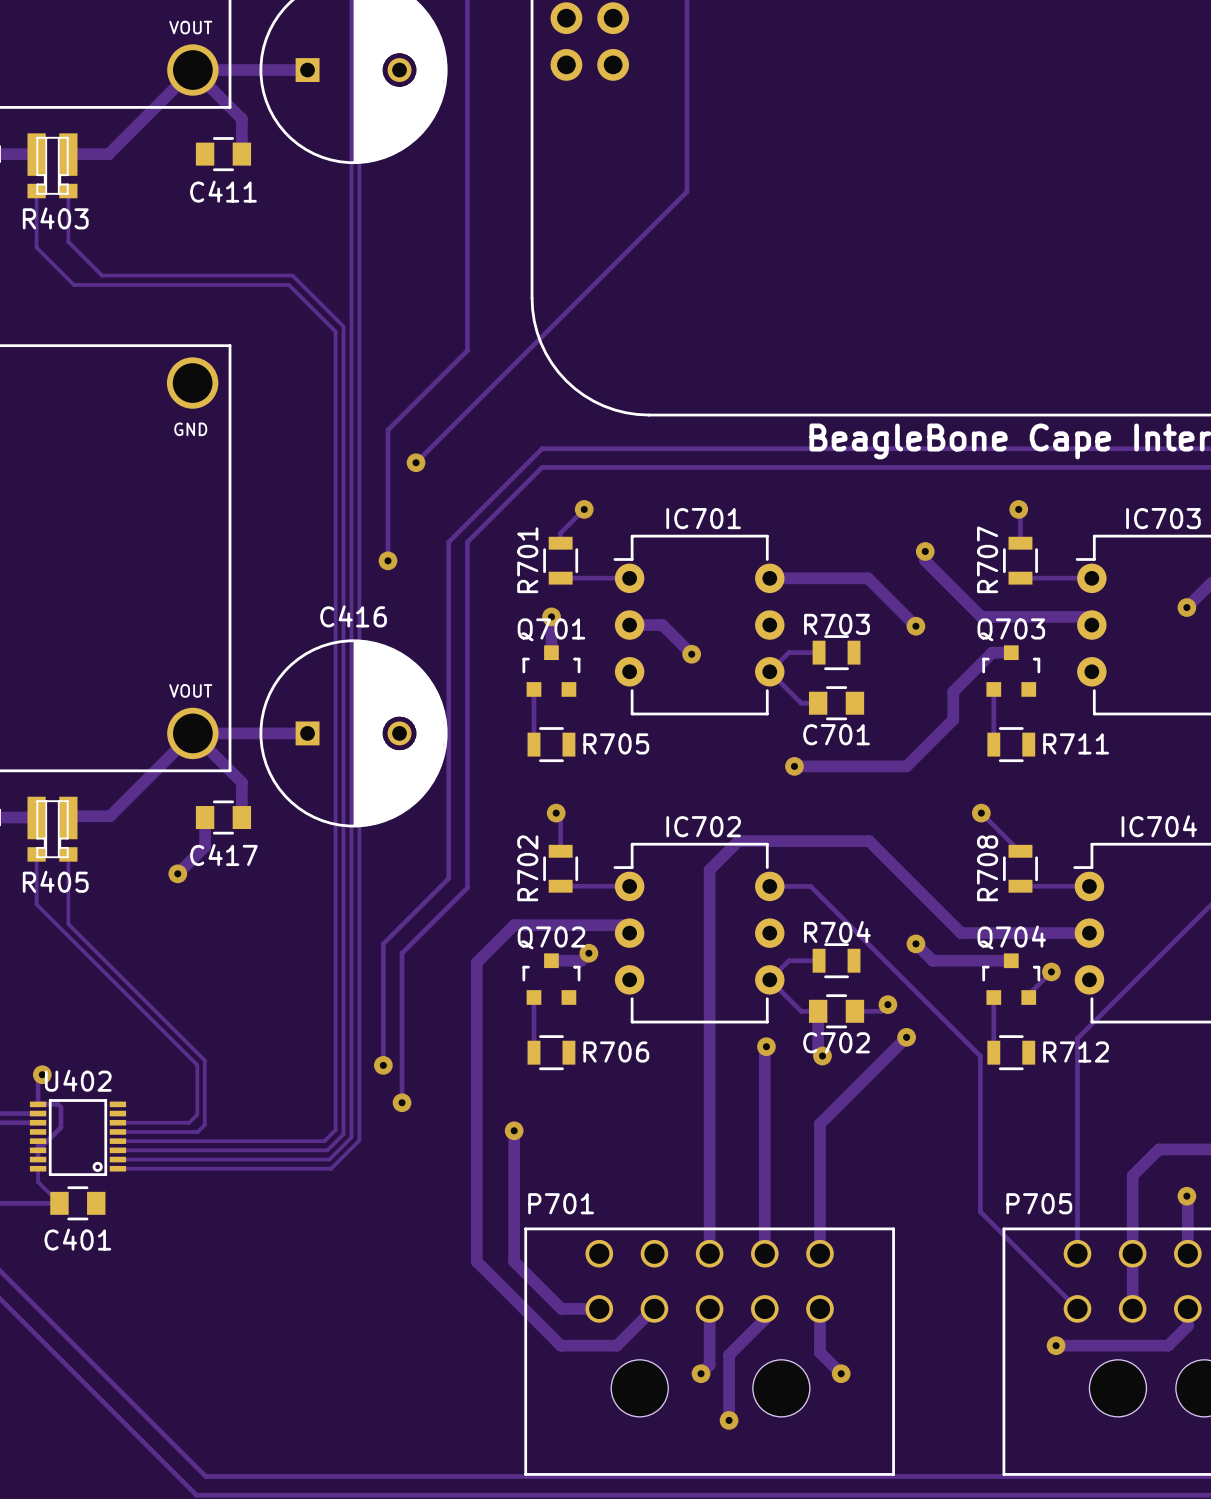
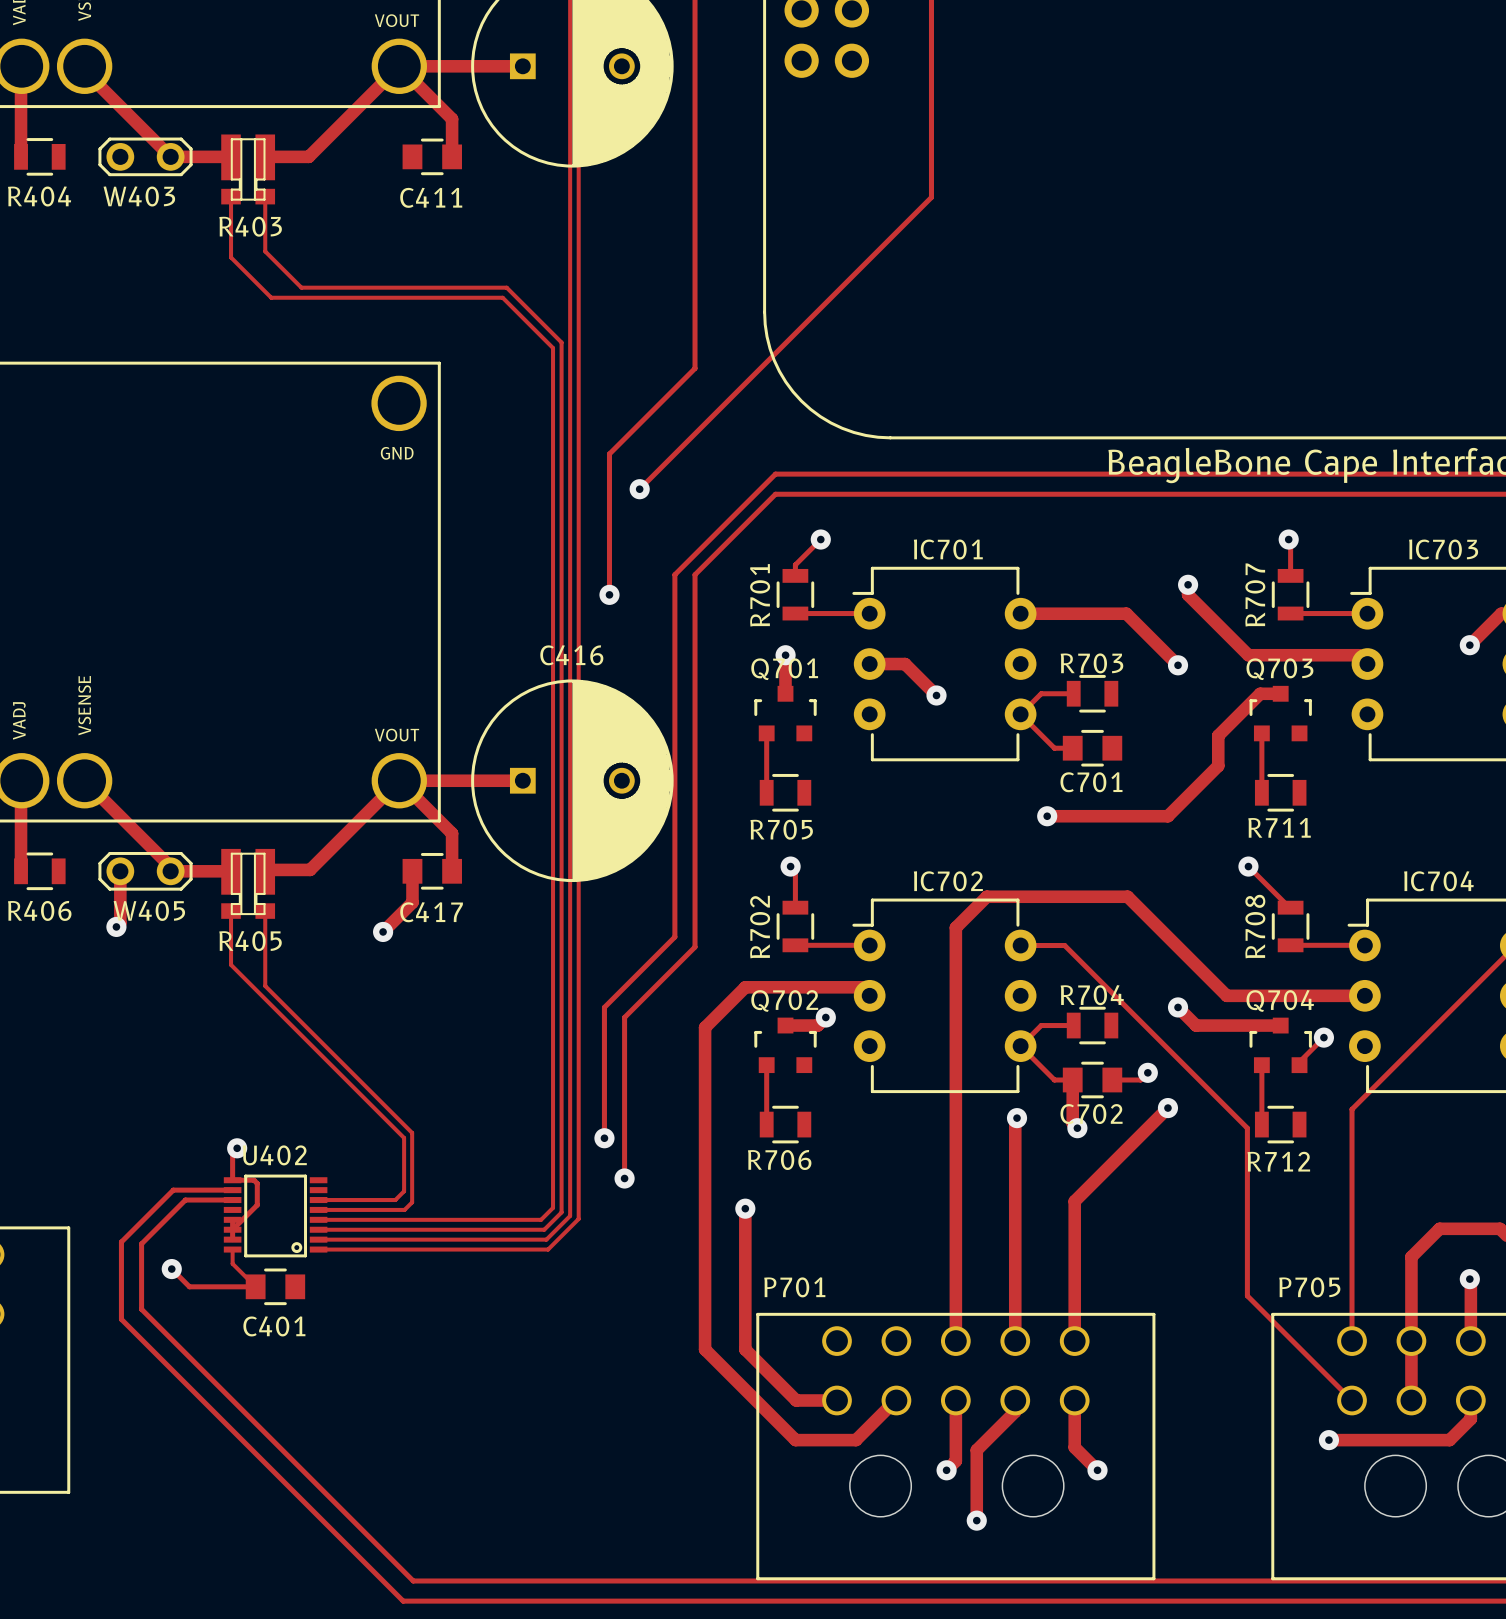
R705 name position: R705 (616, 743) -> R705 (781, 829)
R711 name position: R711 (1076, 743) -> R711 (1279, 827)
R706 name position: R706 (616, 1052) -> R706 (779, 1160)
R712 name position: R712 (1076, 1052) -> R712 (1278, 1161)

